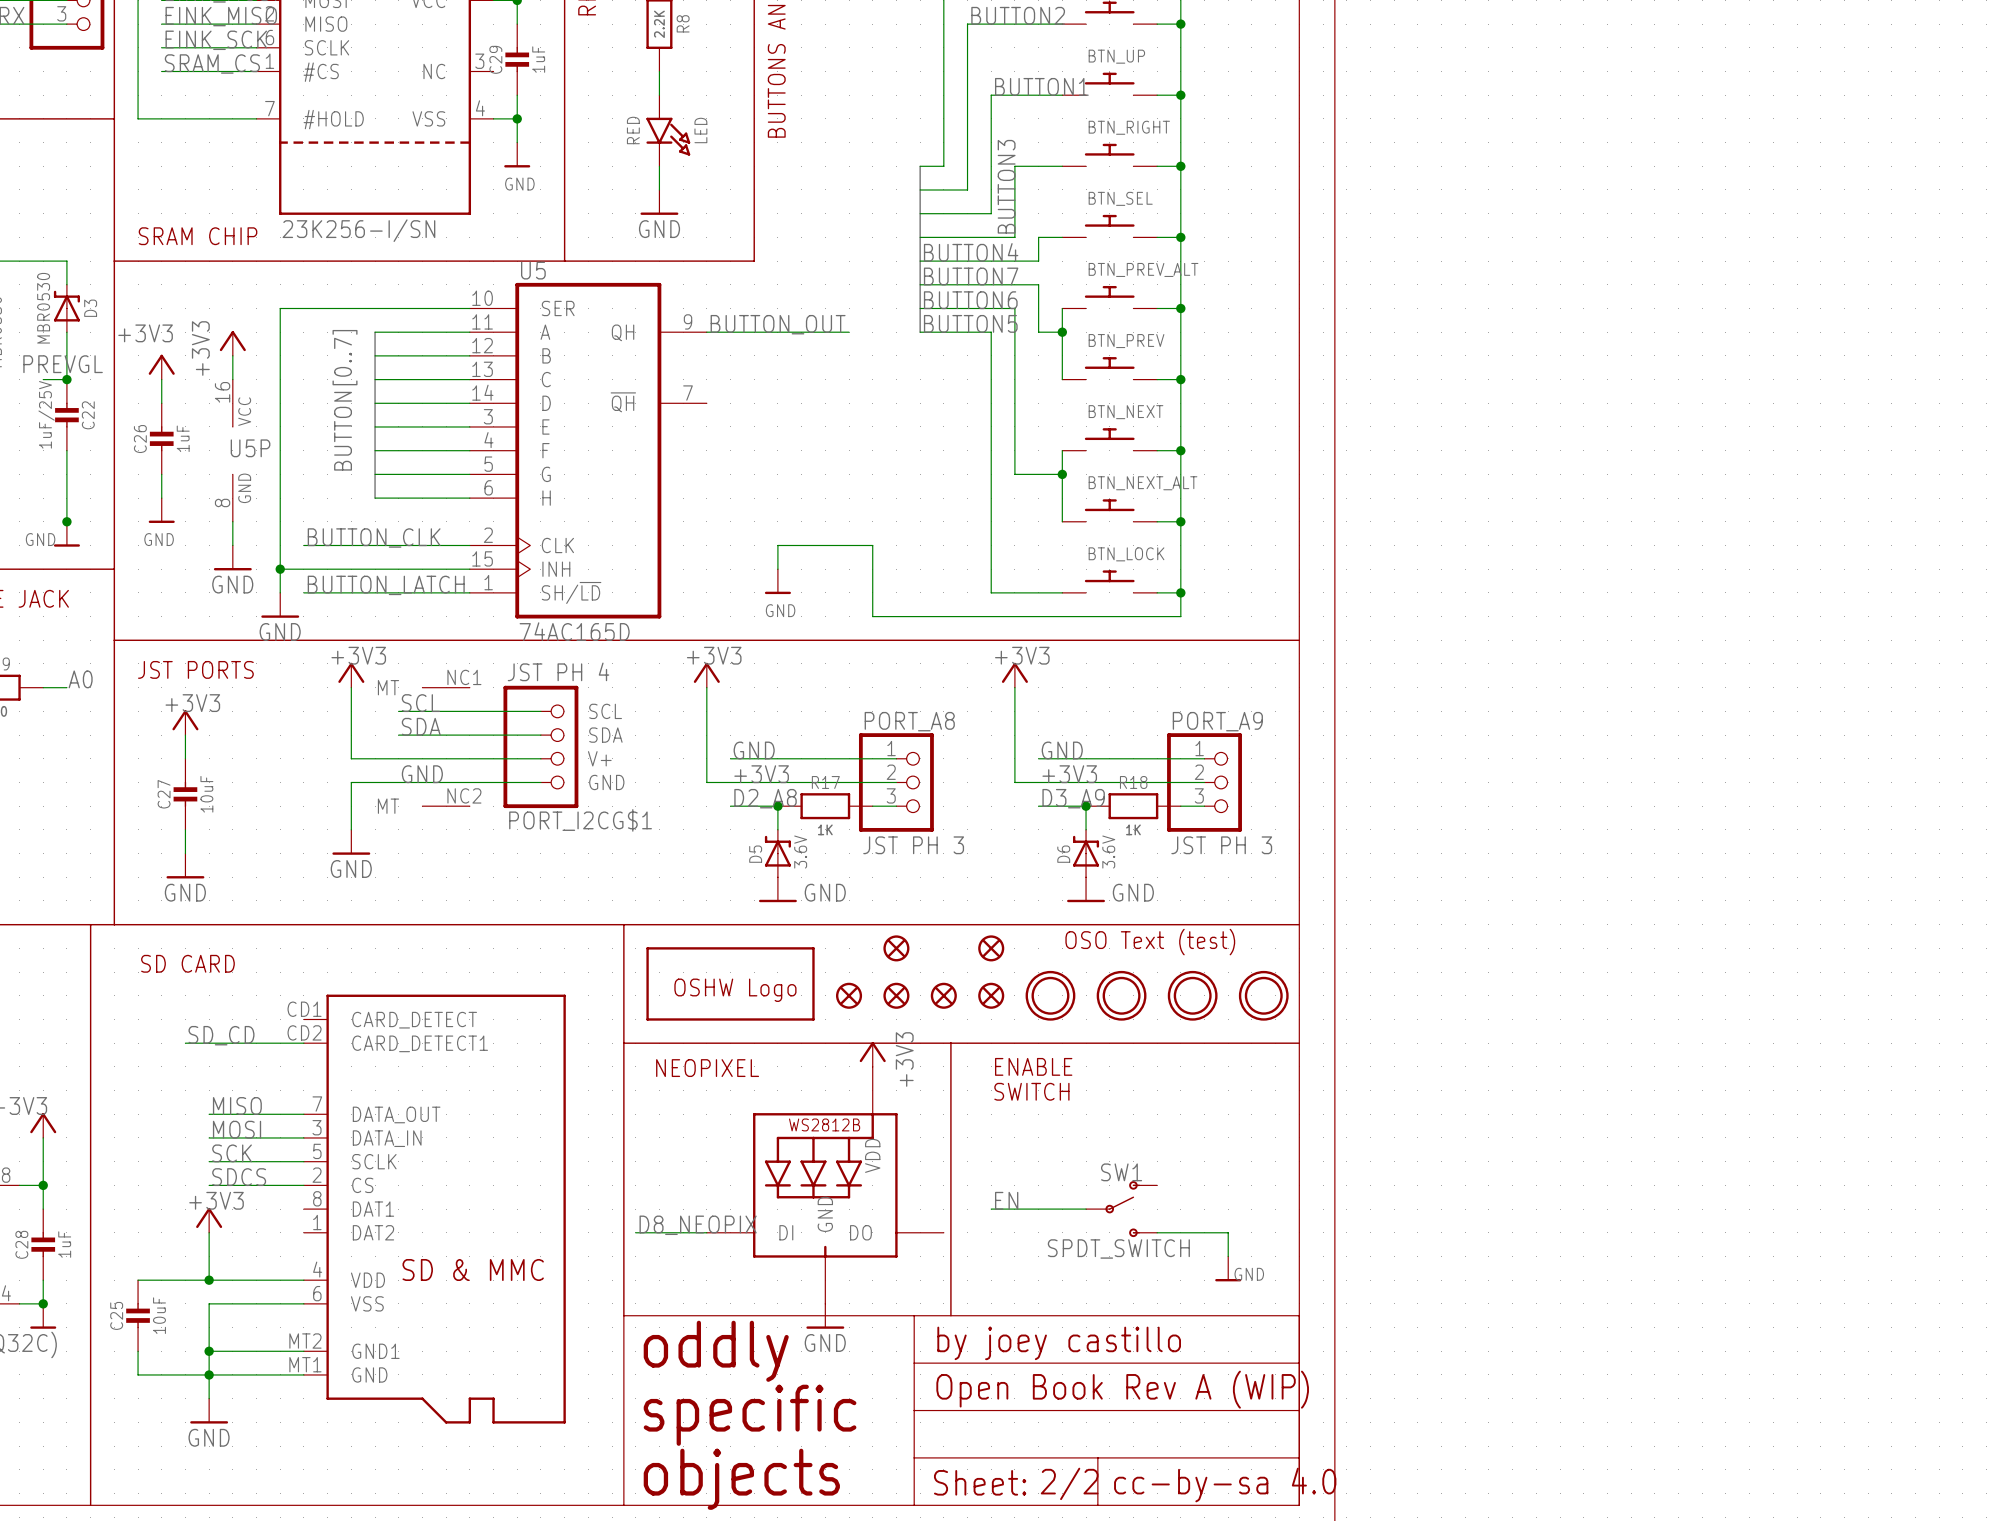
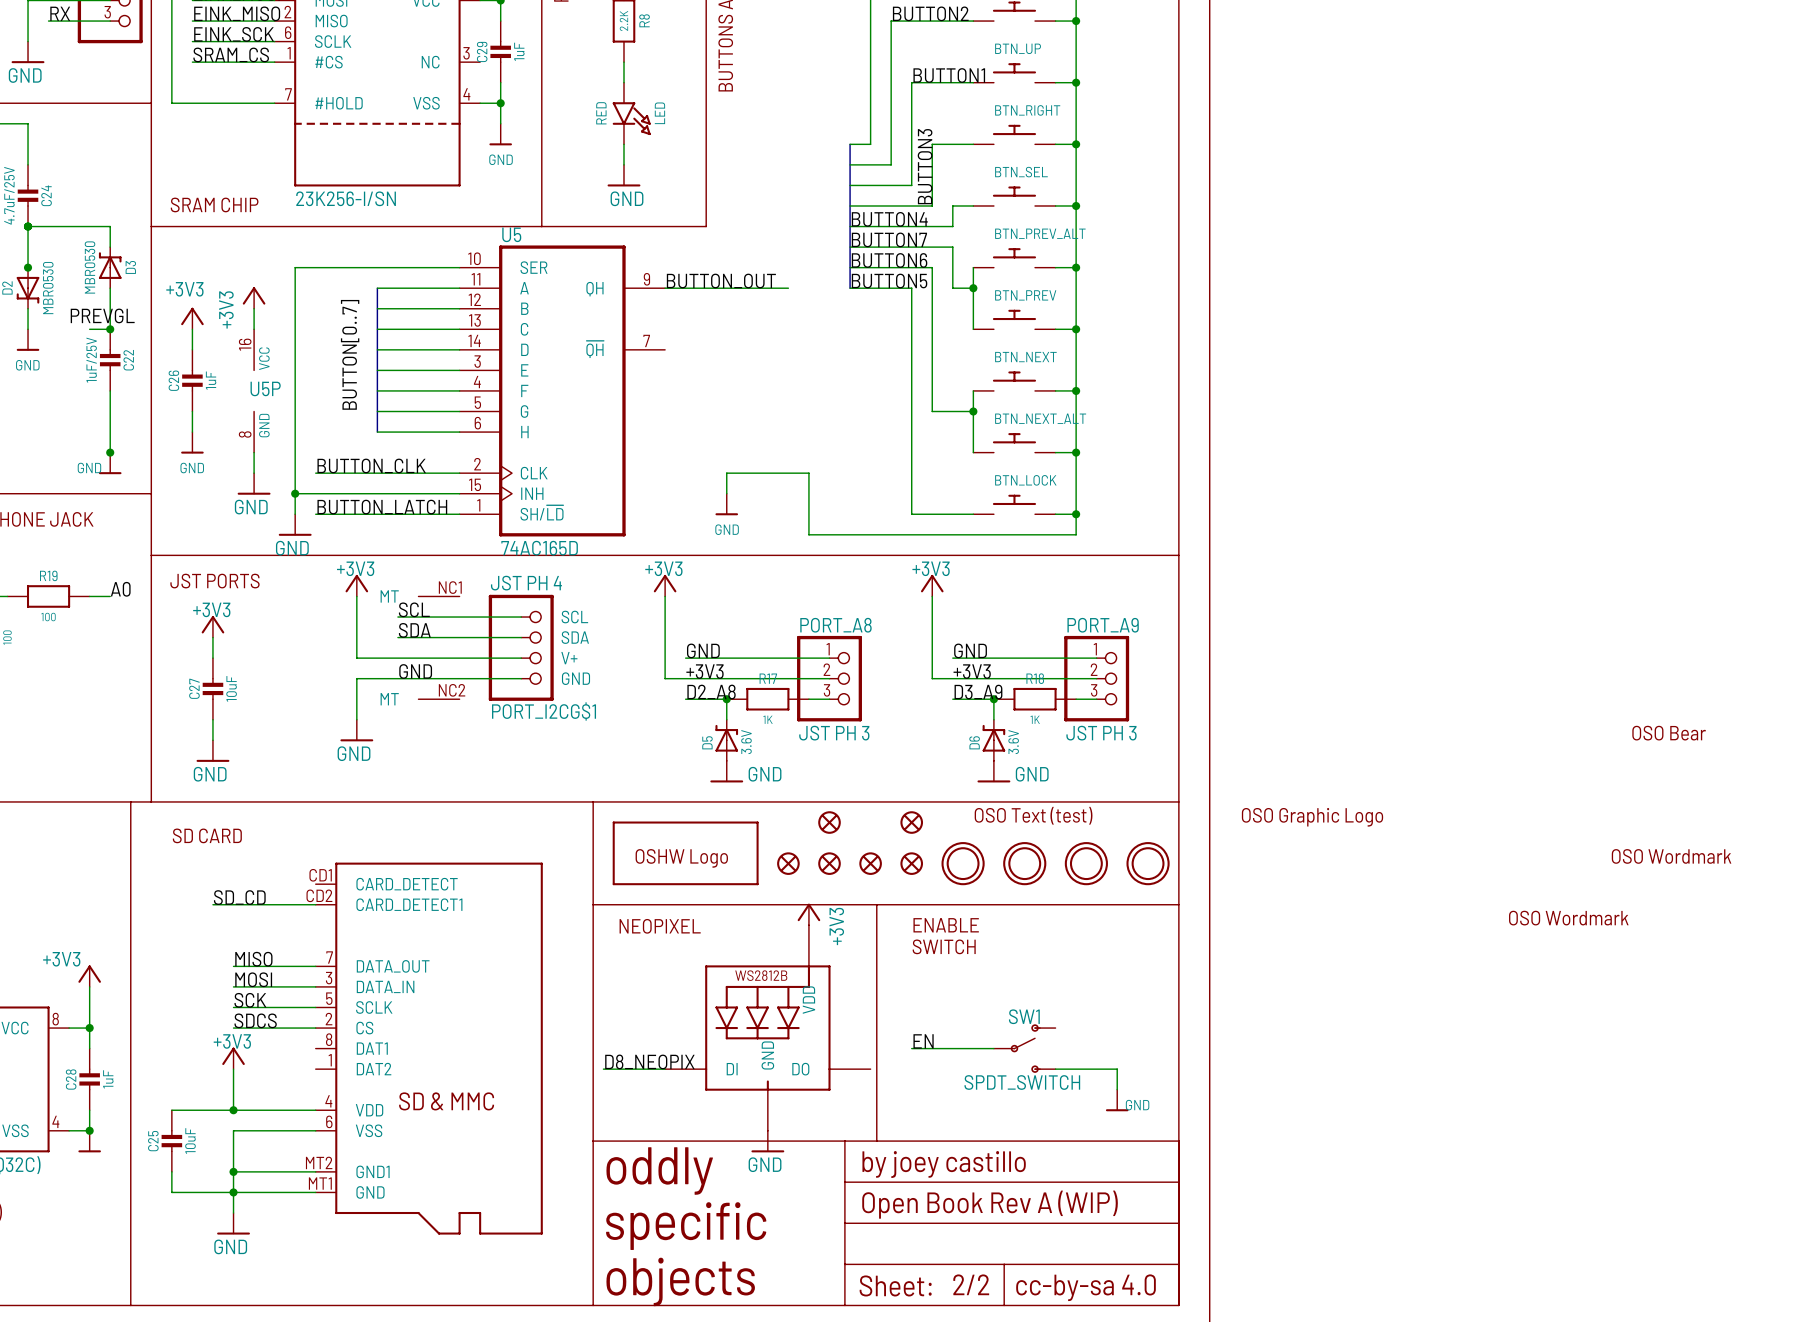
part: none -> (1669, 733)
part: none -> (1312, 817)
part: none -> (1671, 856)
part: none -> (1568, 918)

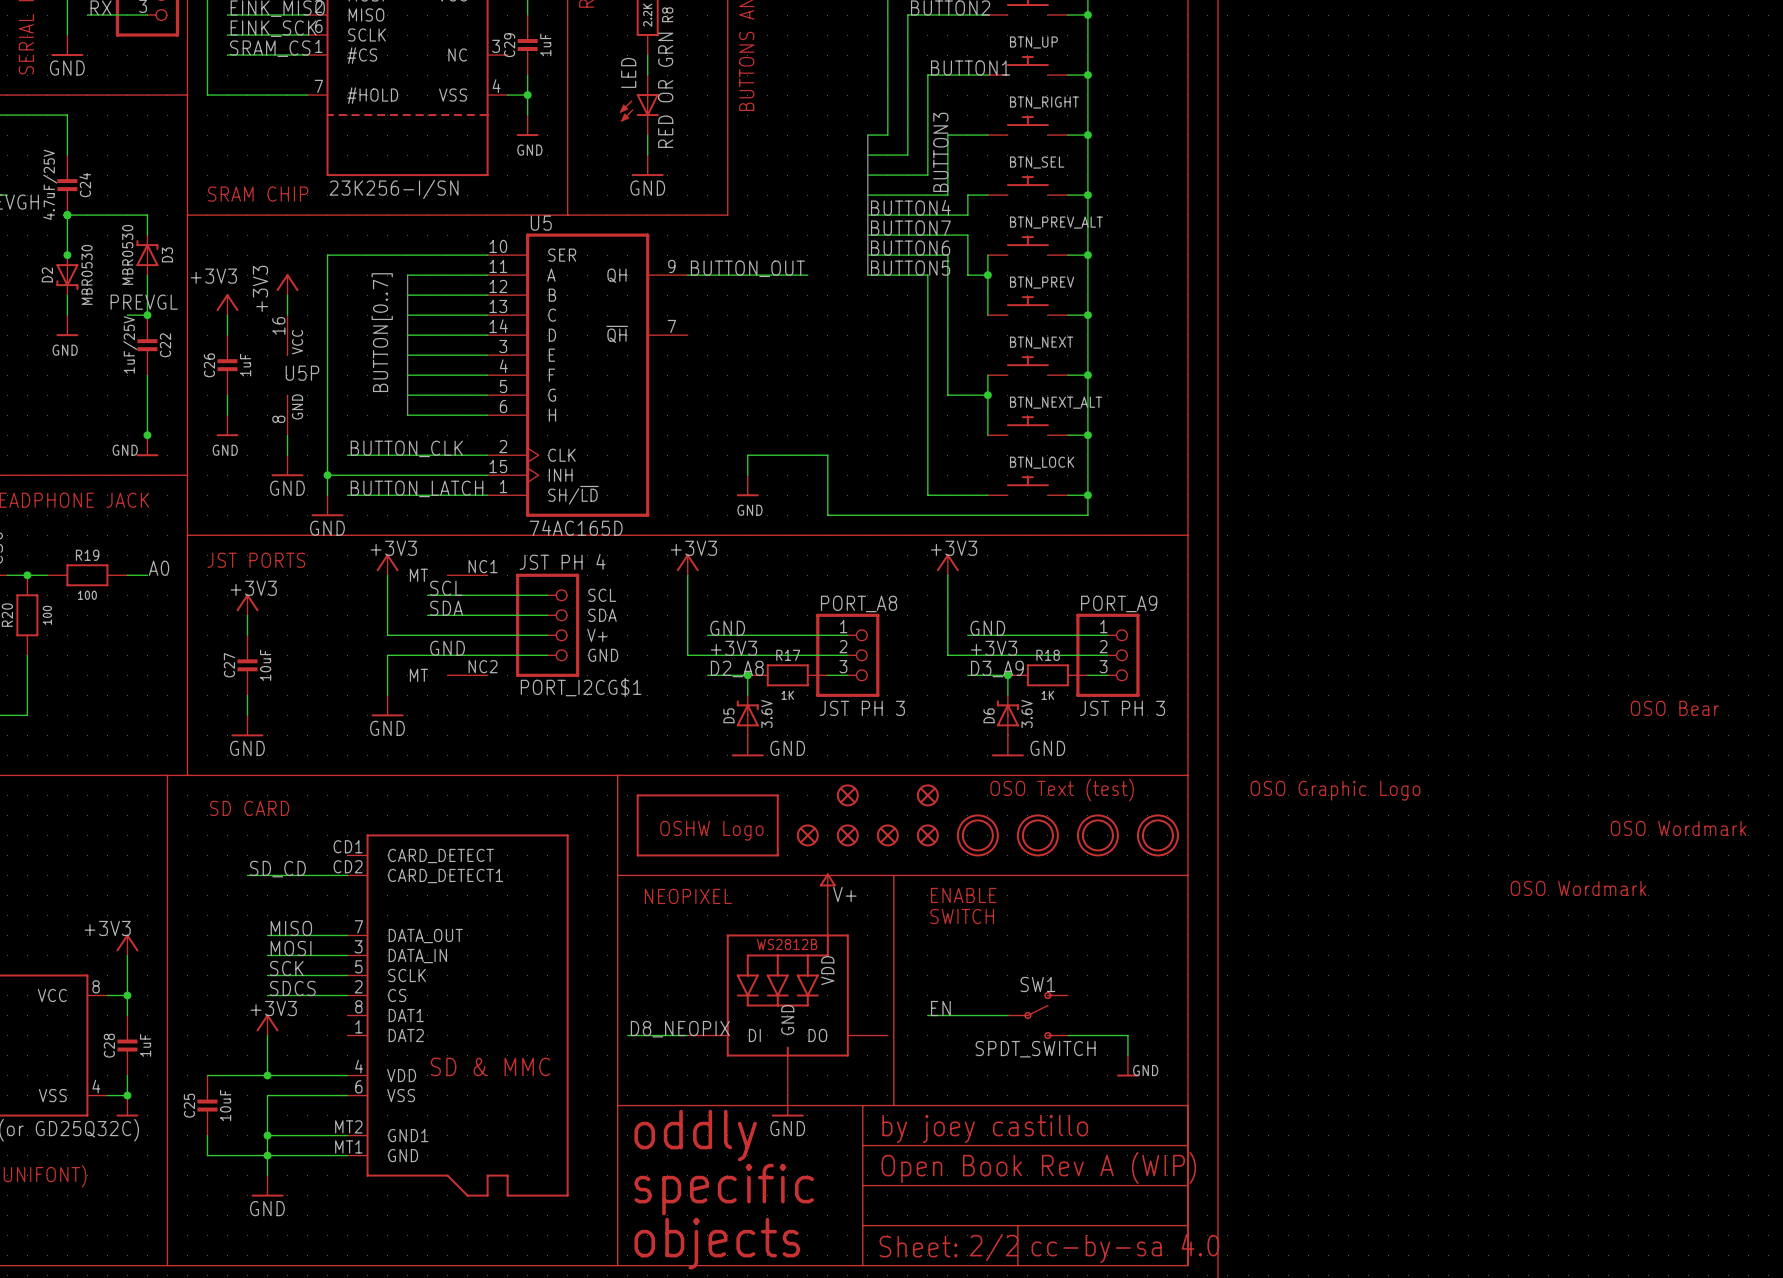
LED: none -> RED OR GRN (639, 105)
LED: RED (631, 113) -> none
power symbol: +3V3 (808, 914) -> V+ (827, 884)

